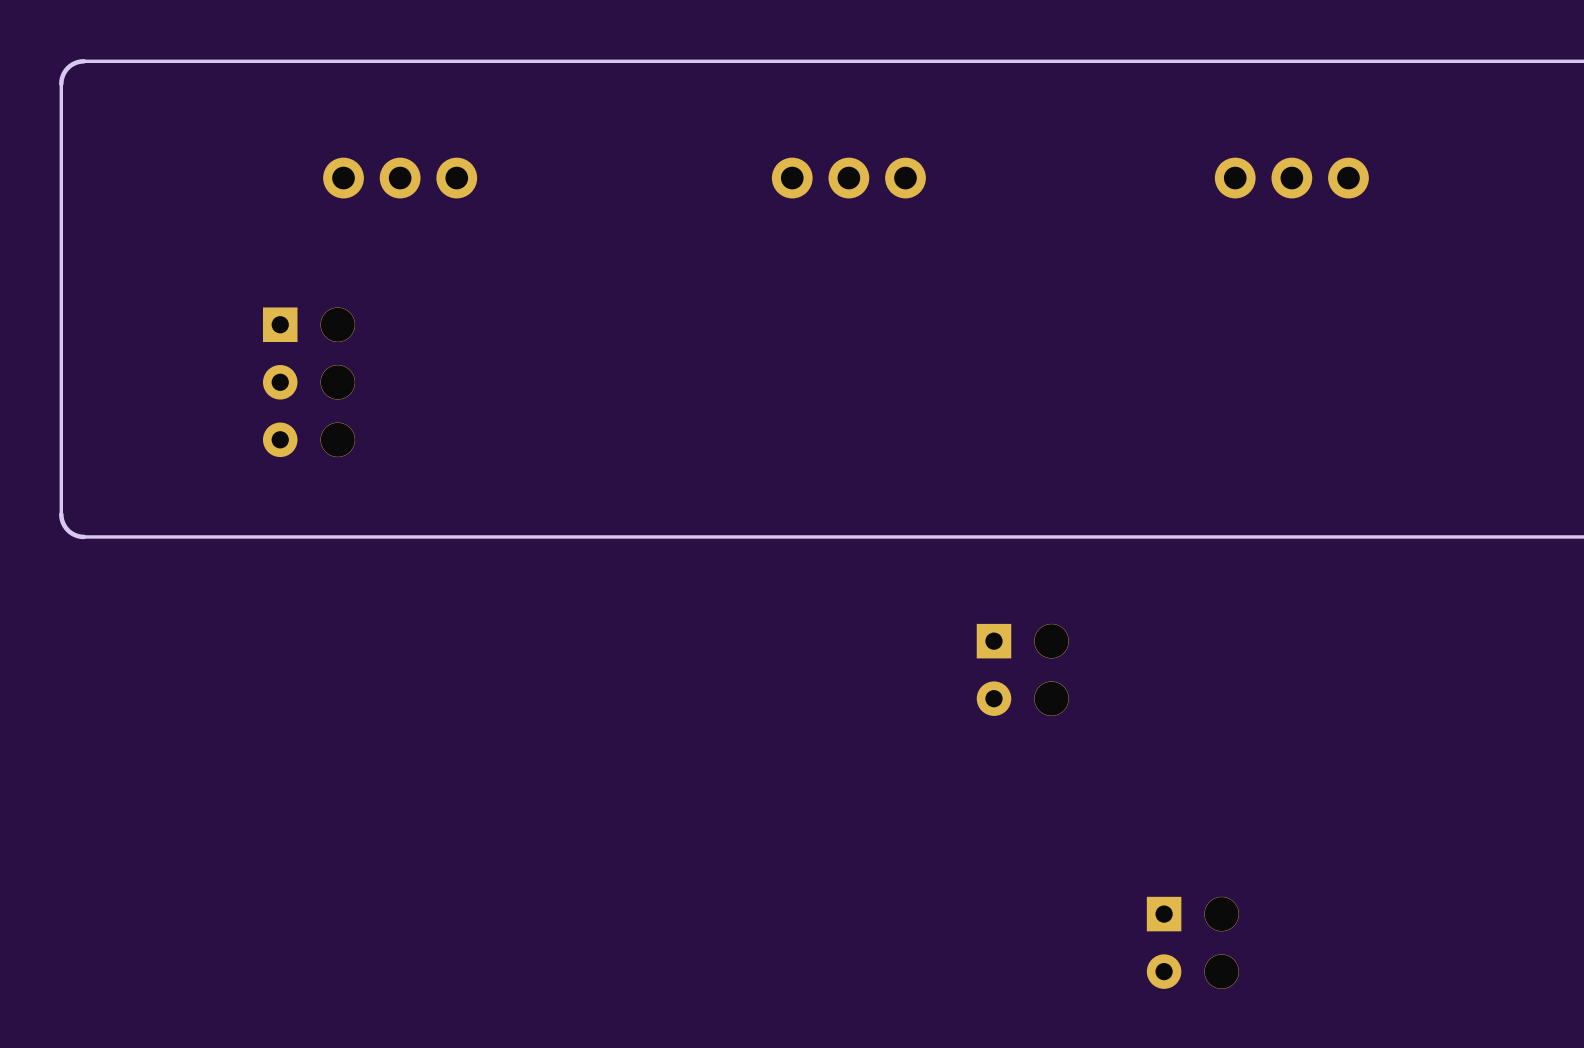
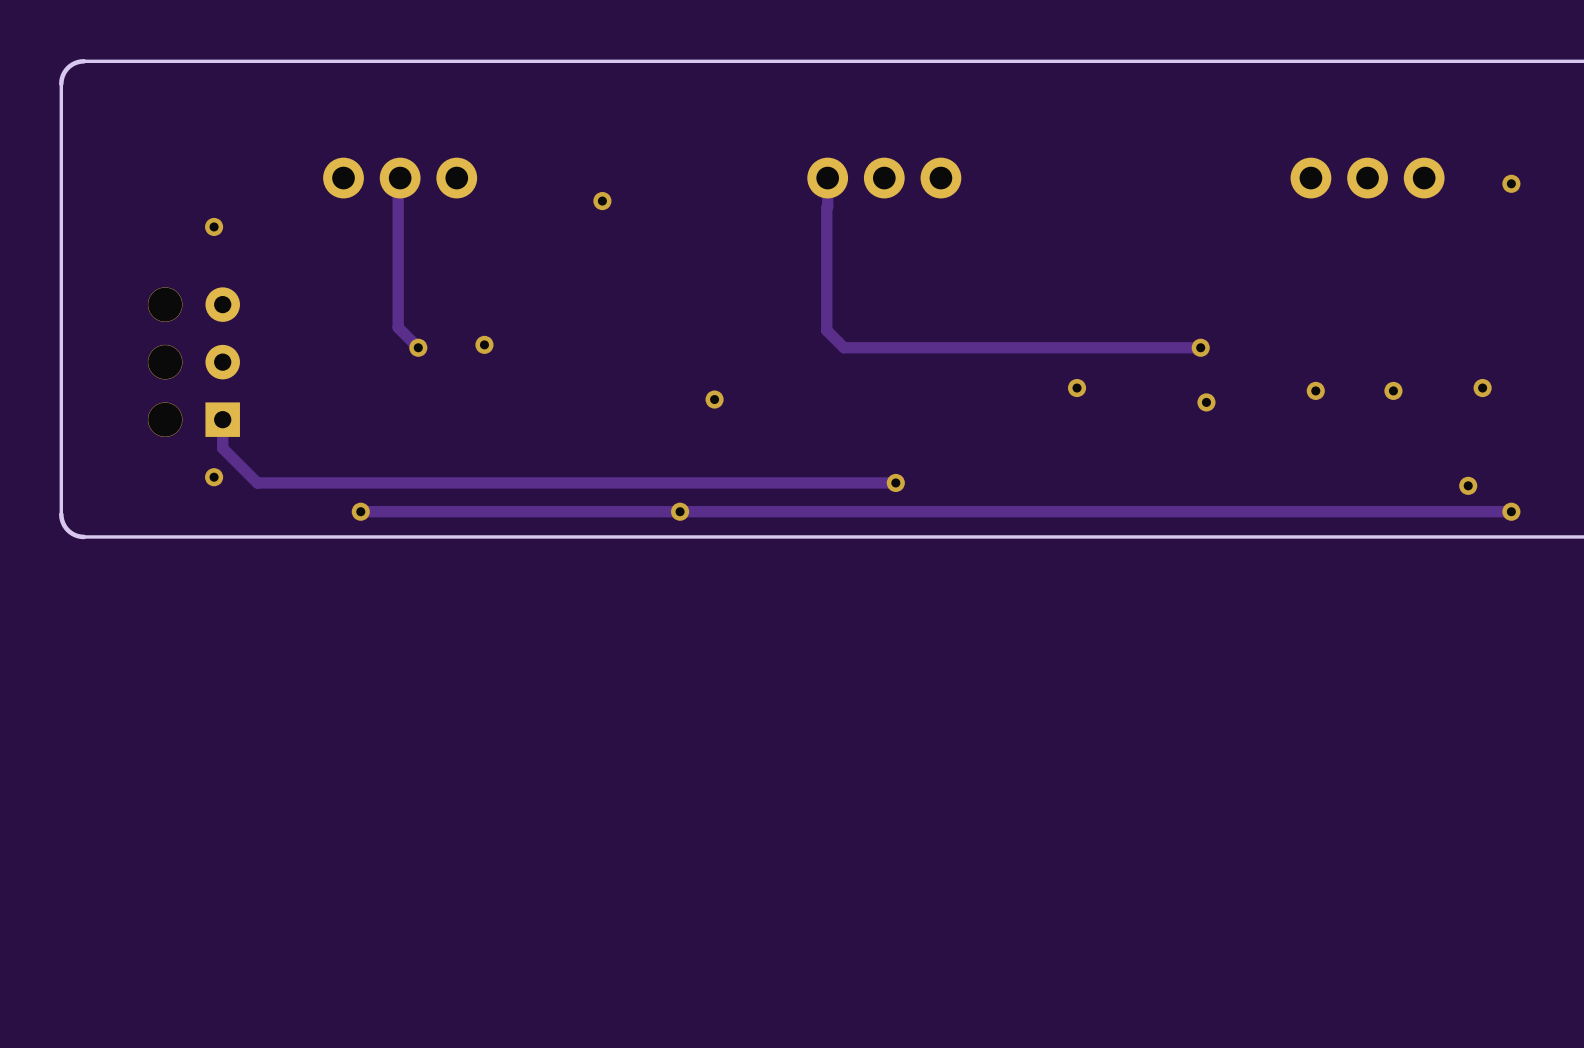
track: none -> (400, 178) (398, 180) (398, 327) (418, 347)
track: none -> (827, 178) (826, 330) (844, 347) (1200, 347)
part position: (848, 178) -> (884, 178)
part position: (1291, 178) -> (1367, 178)
via: none -> (1511, 183)
via: none -> (602, 201)
via: none -> (214, 226)
via: none -> (484, 344)
via: none -> (418, 347)
via: none -> (1200, 347)
part rotation: 0° (309, 382) -> 180° (193, 362)
part position: (309, 382) -> (193, 362)
via: none -> (1077, 388)
via: none -> (1482, 388)
via: none -> (1315, 390)
via: none -> (1393, 390)
via: none -> (714, 399)
via: none -> (1206, 402)
track: none -> (222, 419) (222, 448) (257, 482) (895, 482)
via: none -> (214, 477)
via: none -> (895, 482)
via: none -> (1468, 485)
via: none -> (360, 511)
via: none -> (680, 511)
track: none -> (1511, 511) (360, 511)
via: none -> (1511, 511)
part: (1022, 669) -> none
part: (1192, 942) -> none

